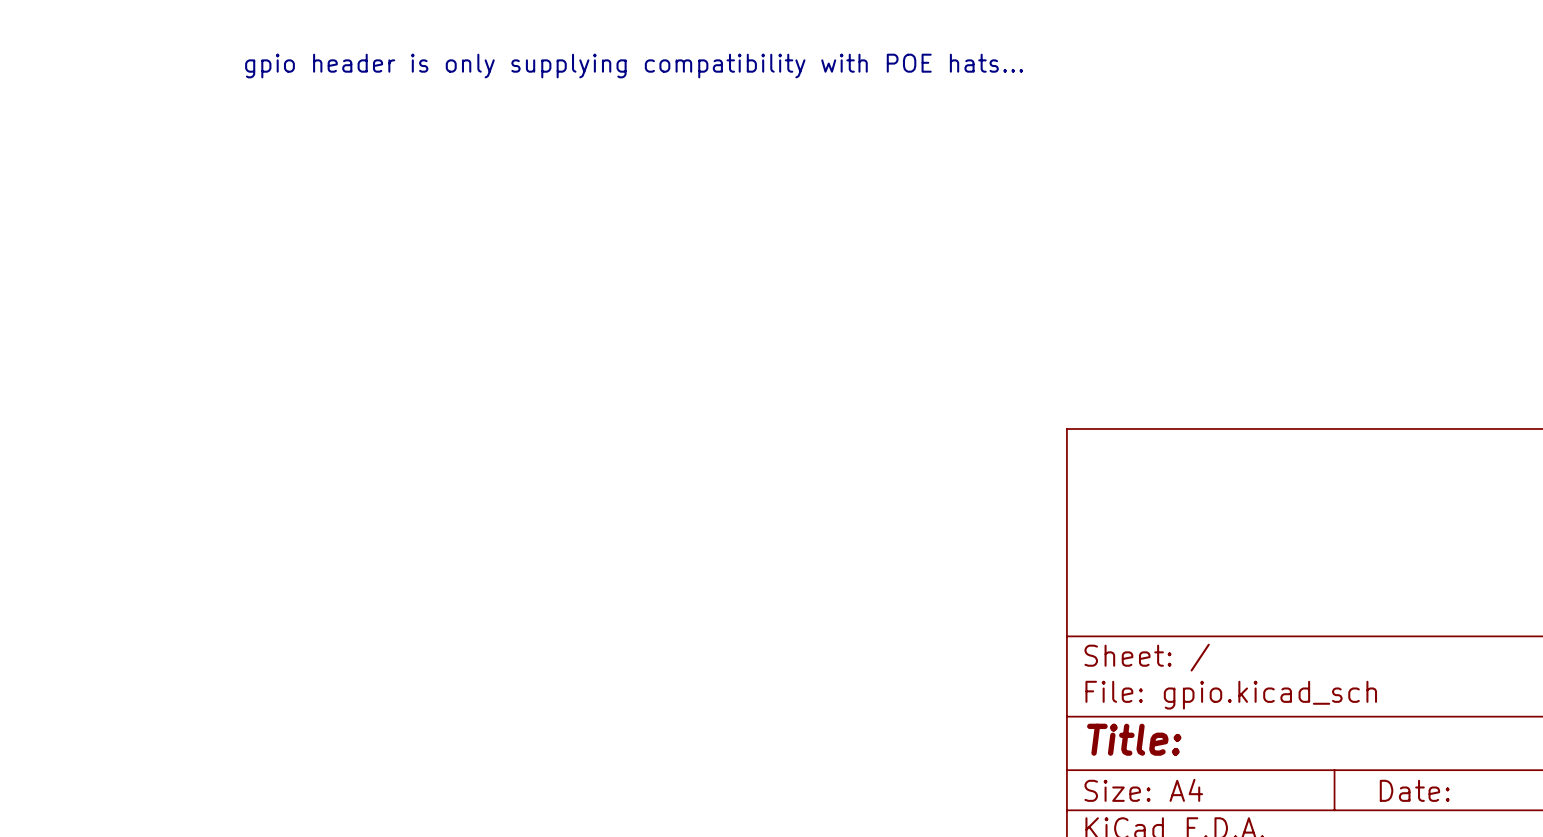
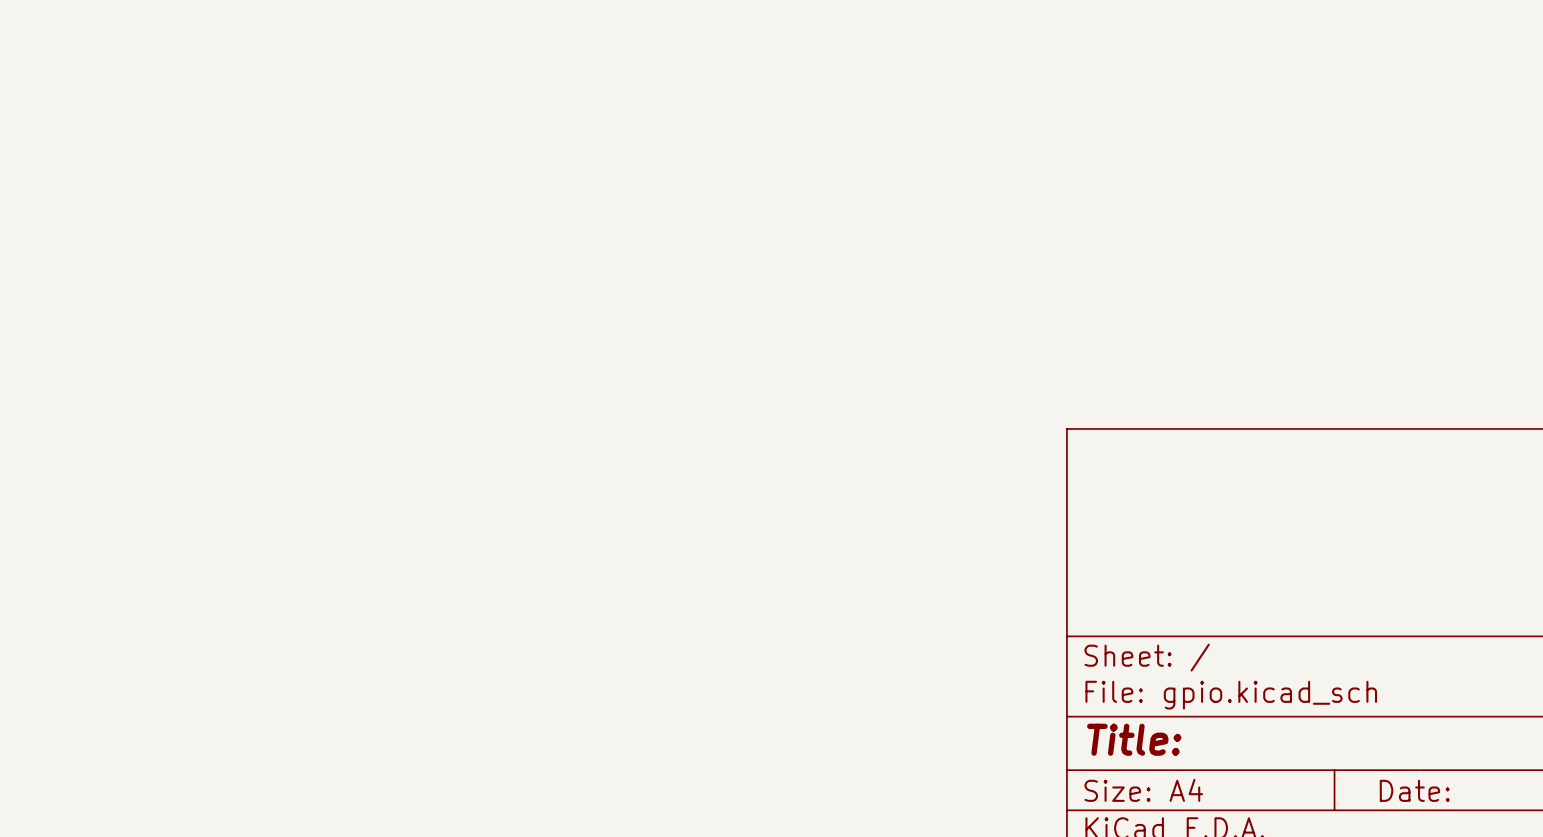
text: gpio header is only supplying compatibility with POE hats... (634, 66) -> none

